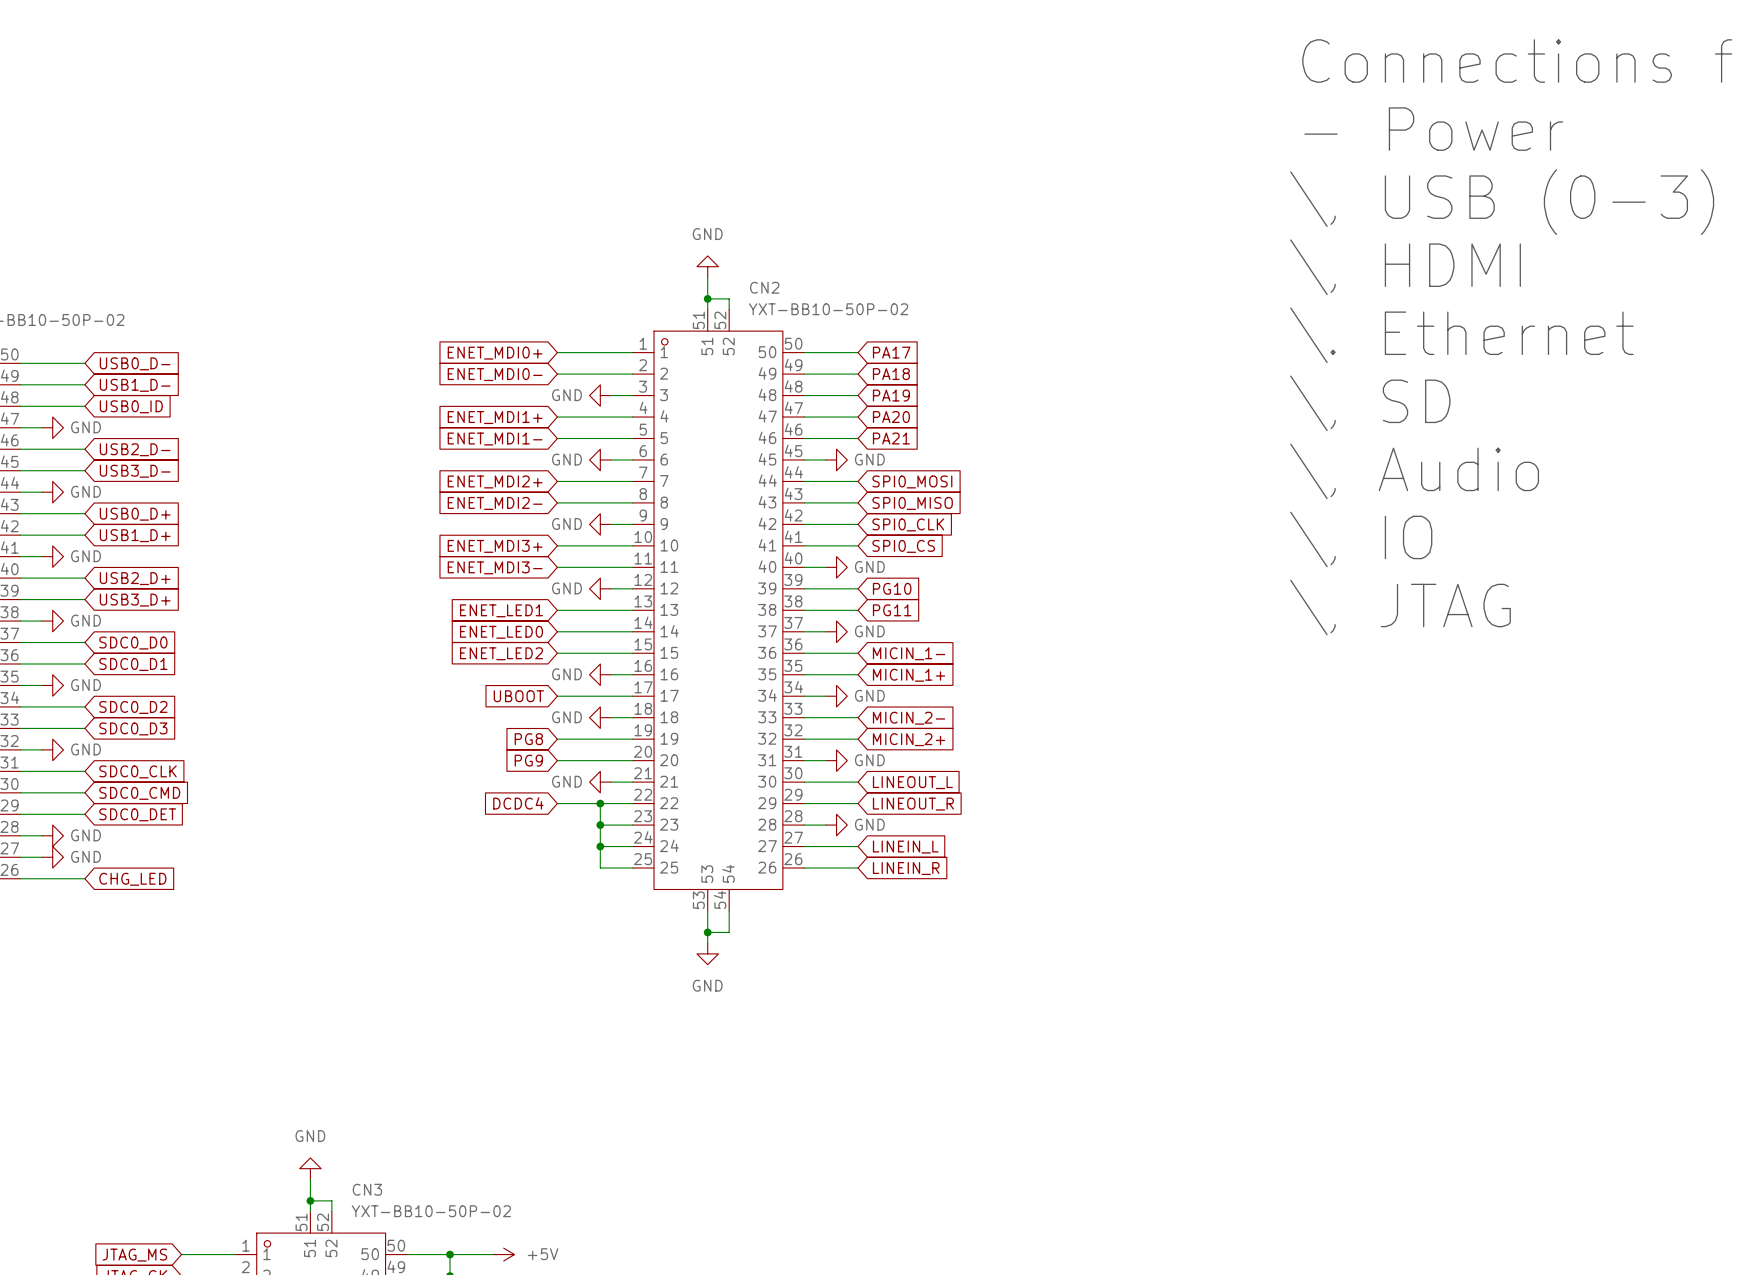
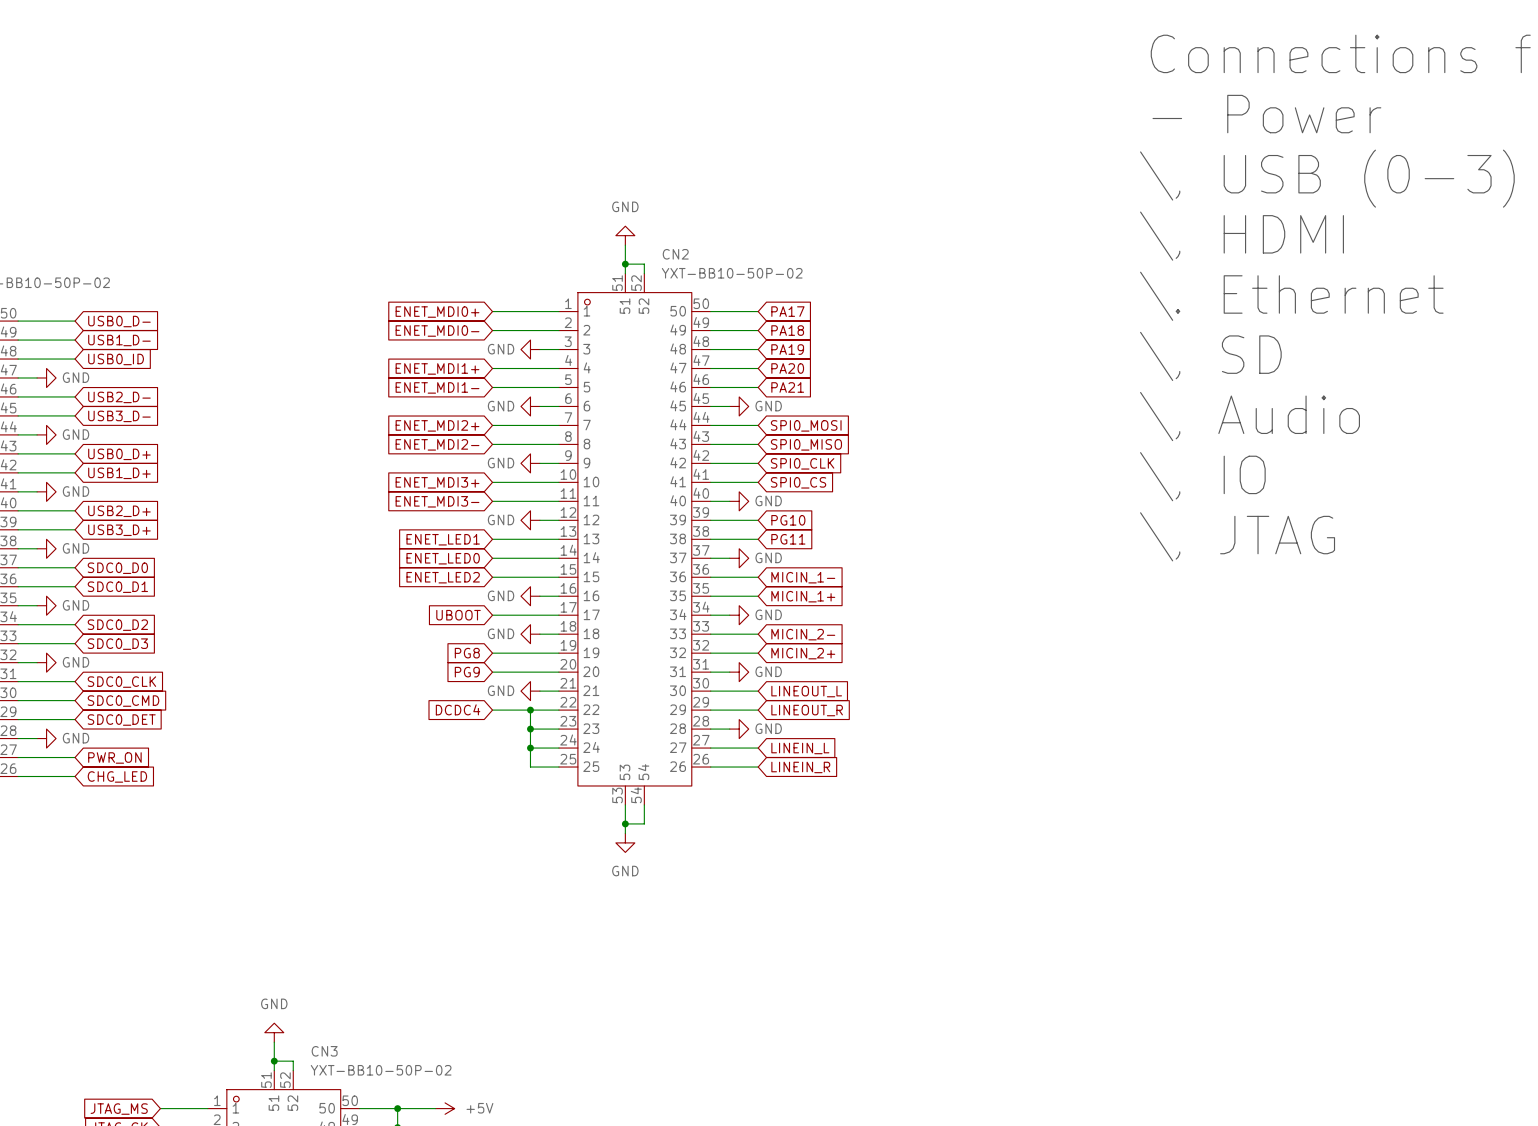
wire: none -> (37, 757) (75, 757)
power symbol: GND (52, 857) -> none
global label: none -> PWR_ON (114, 757)

